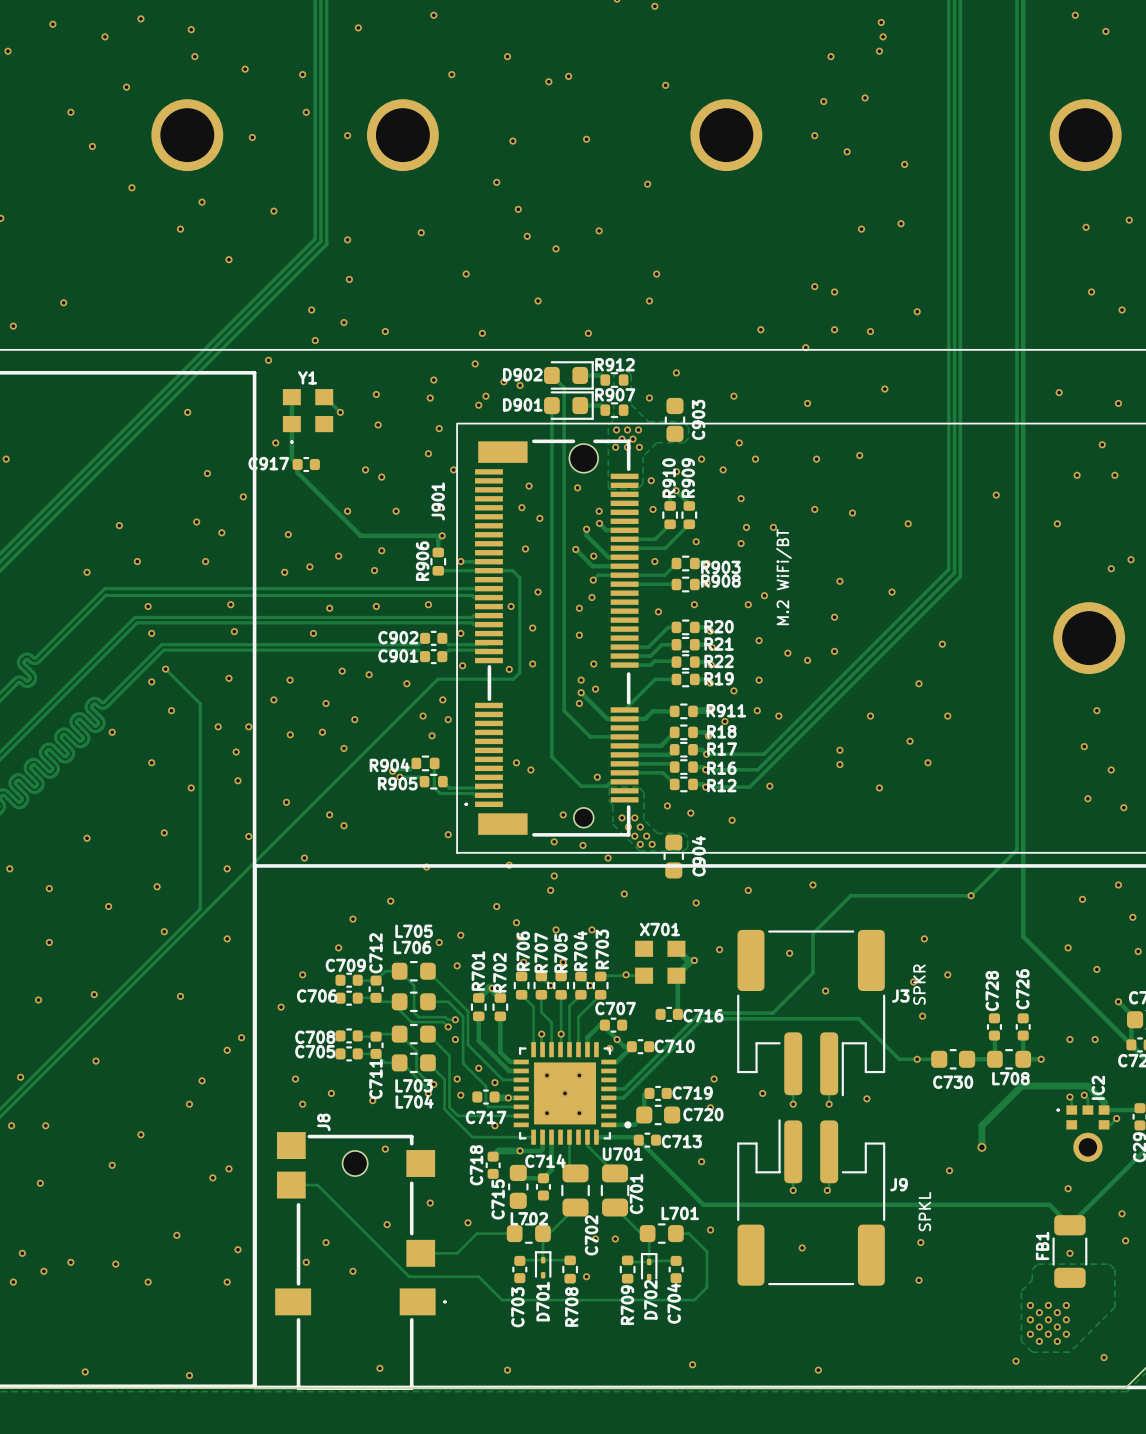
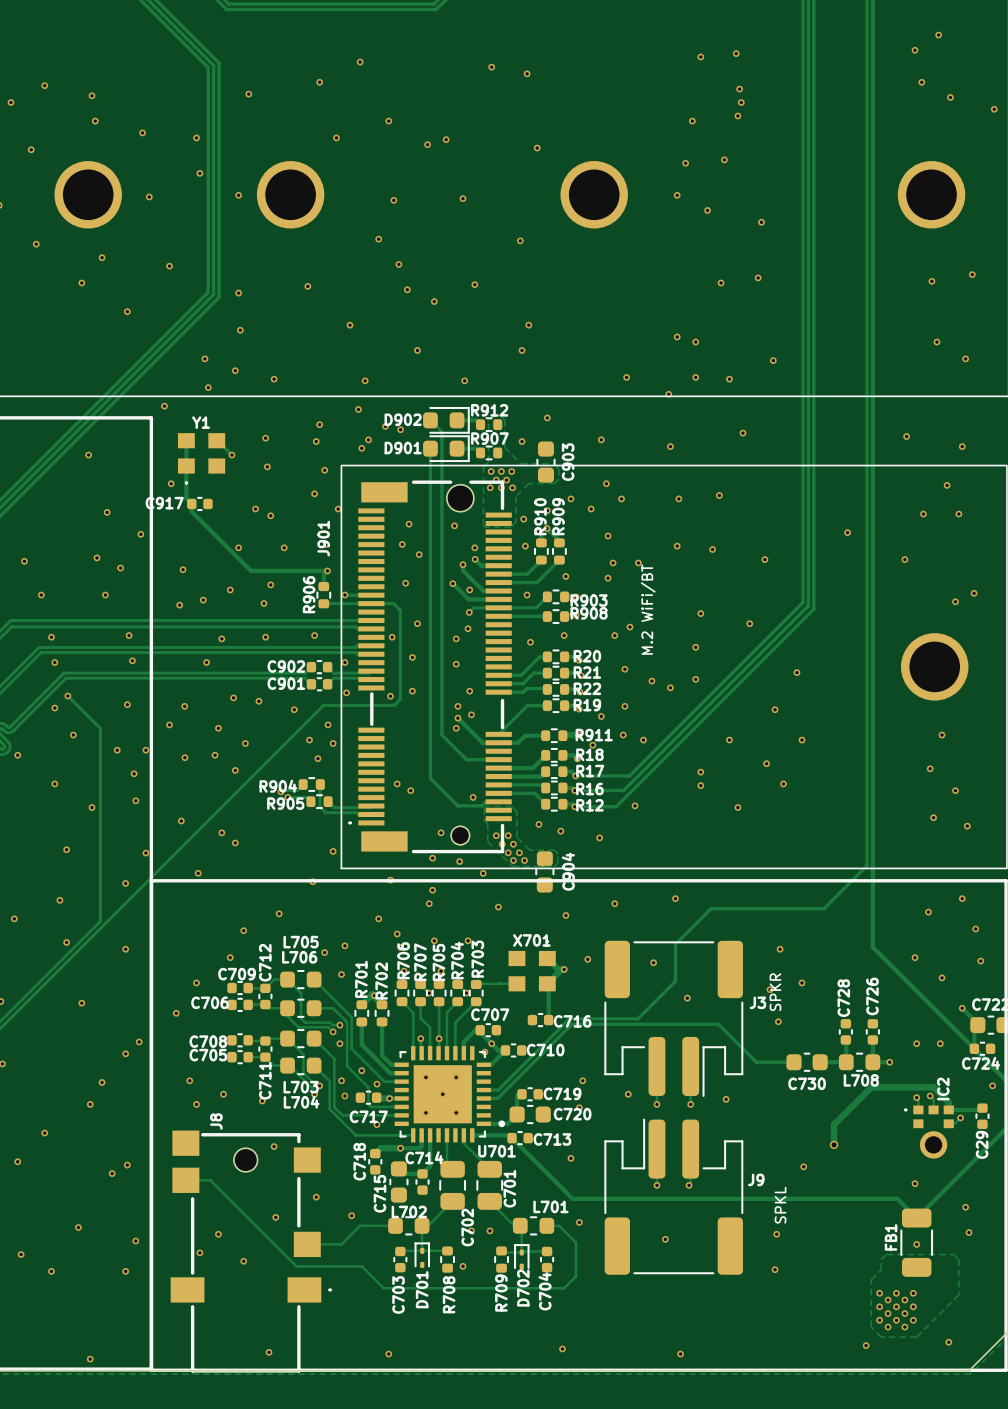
via: (971, 895) -> none
via: (626, 974) -> none
via: (917, 1059) -> none

